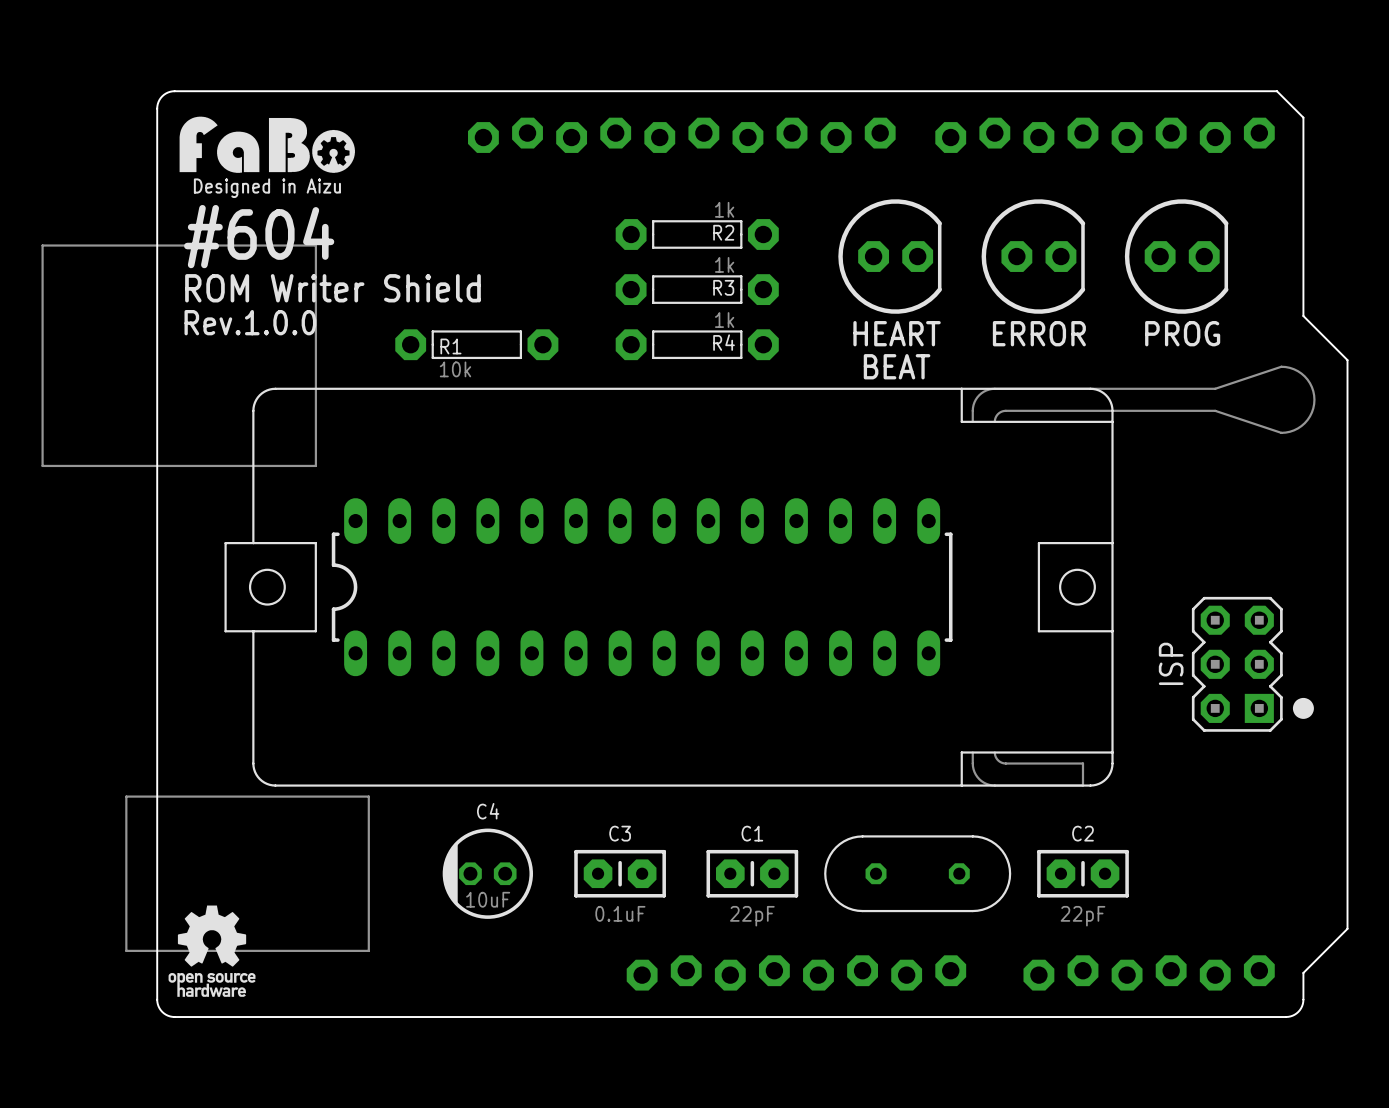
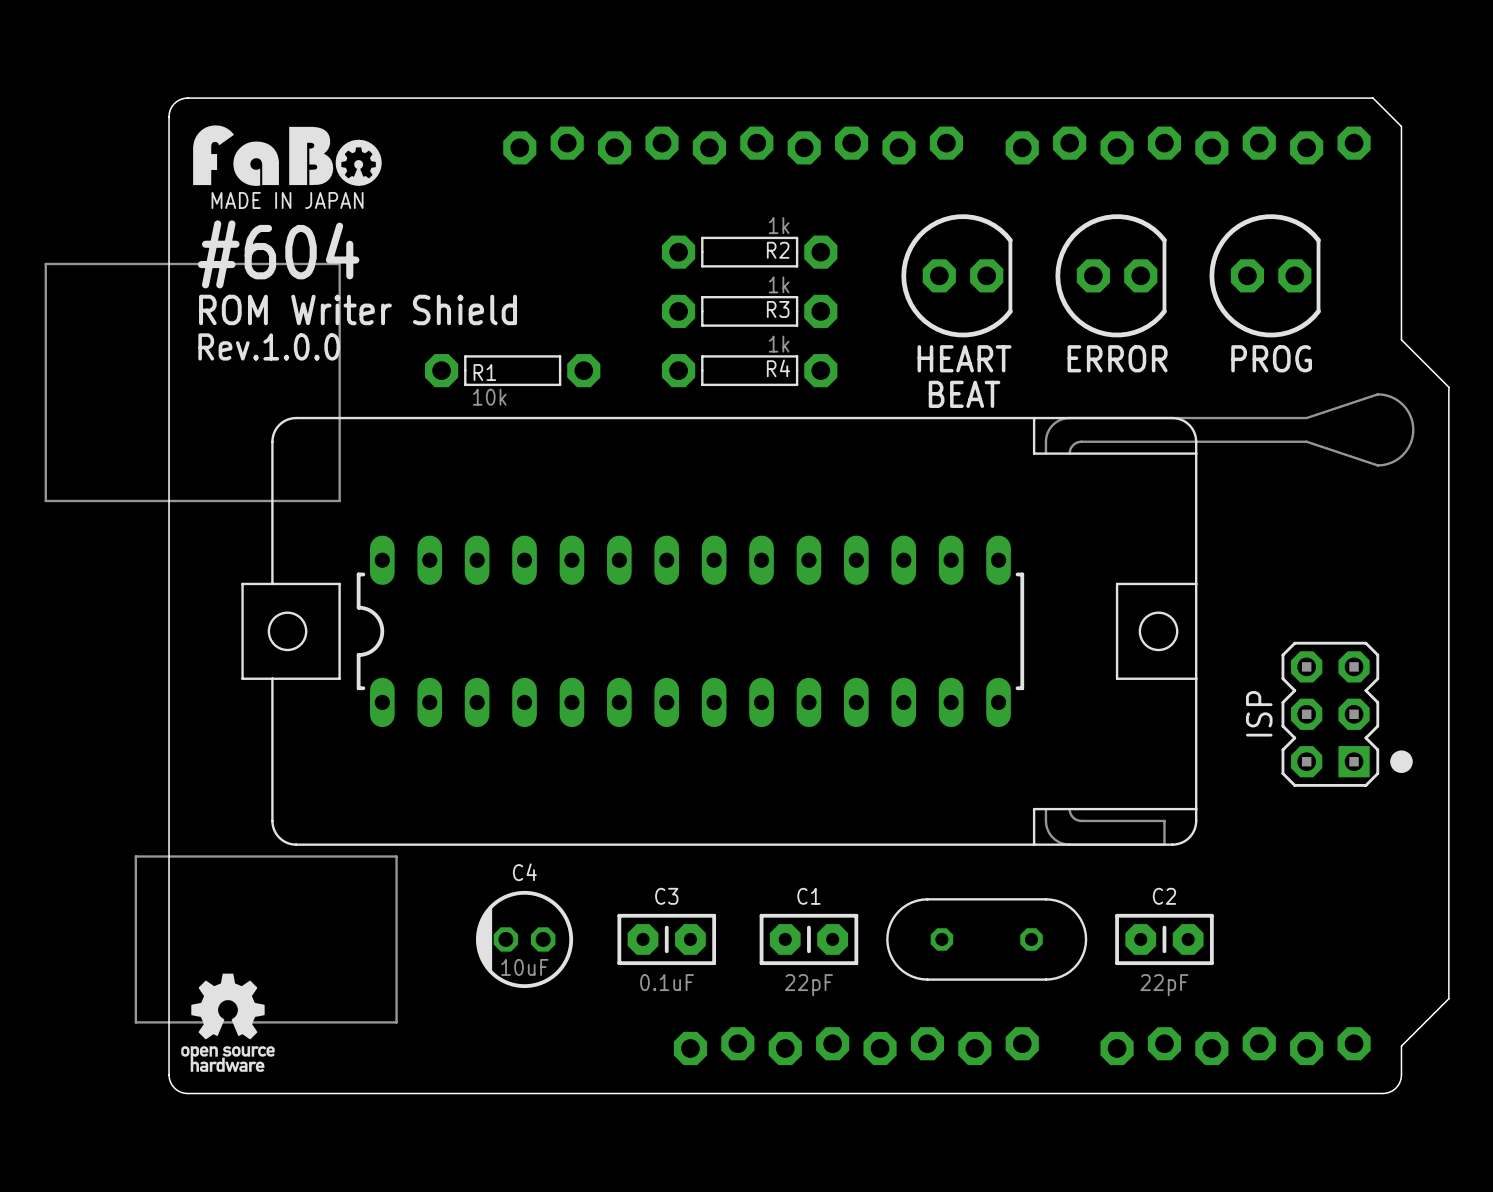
text: Designed in Aizu (267, 188) -> MADE IN JAPAN (287, 200)

